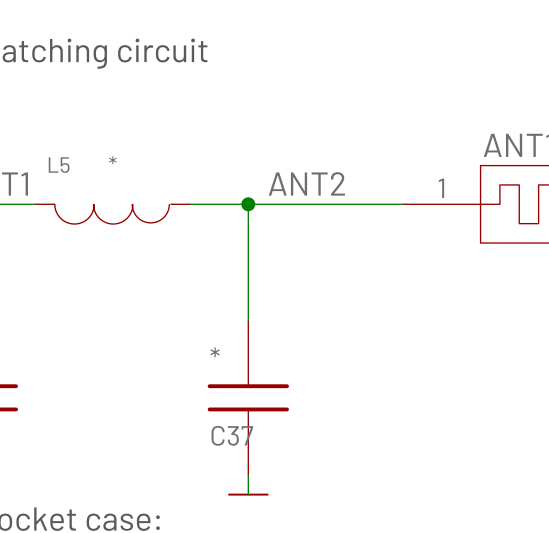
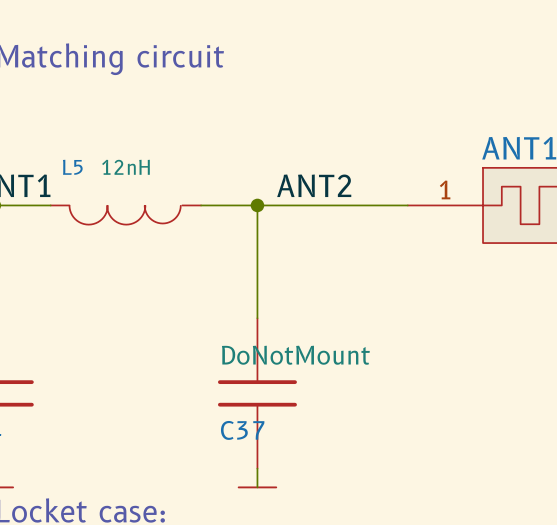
L5 value: * (112, 160) -> 12nH (125, 167)
C37 value: * (215, 352) -> DoNotMount (295, 355)

